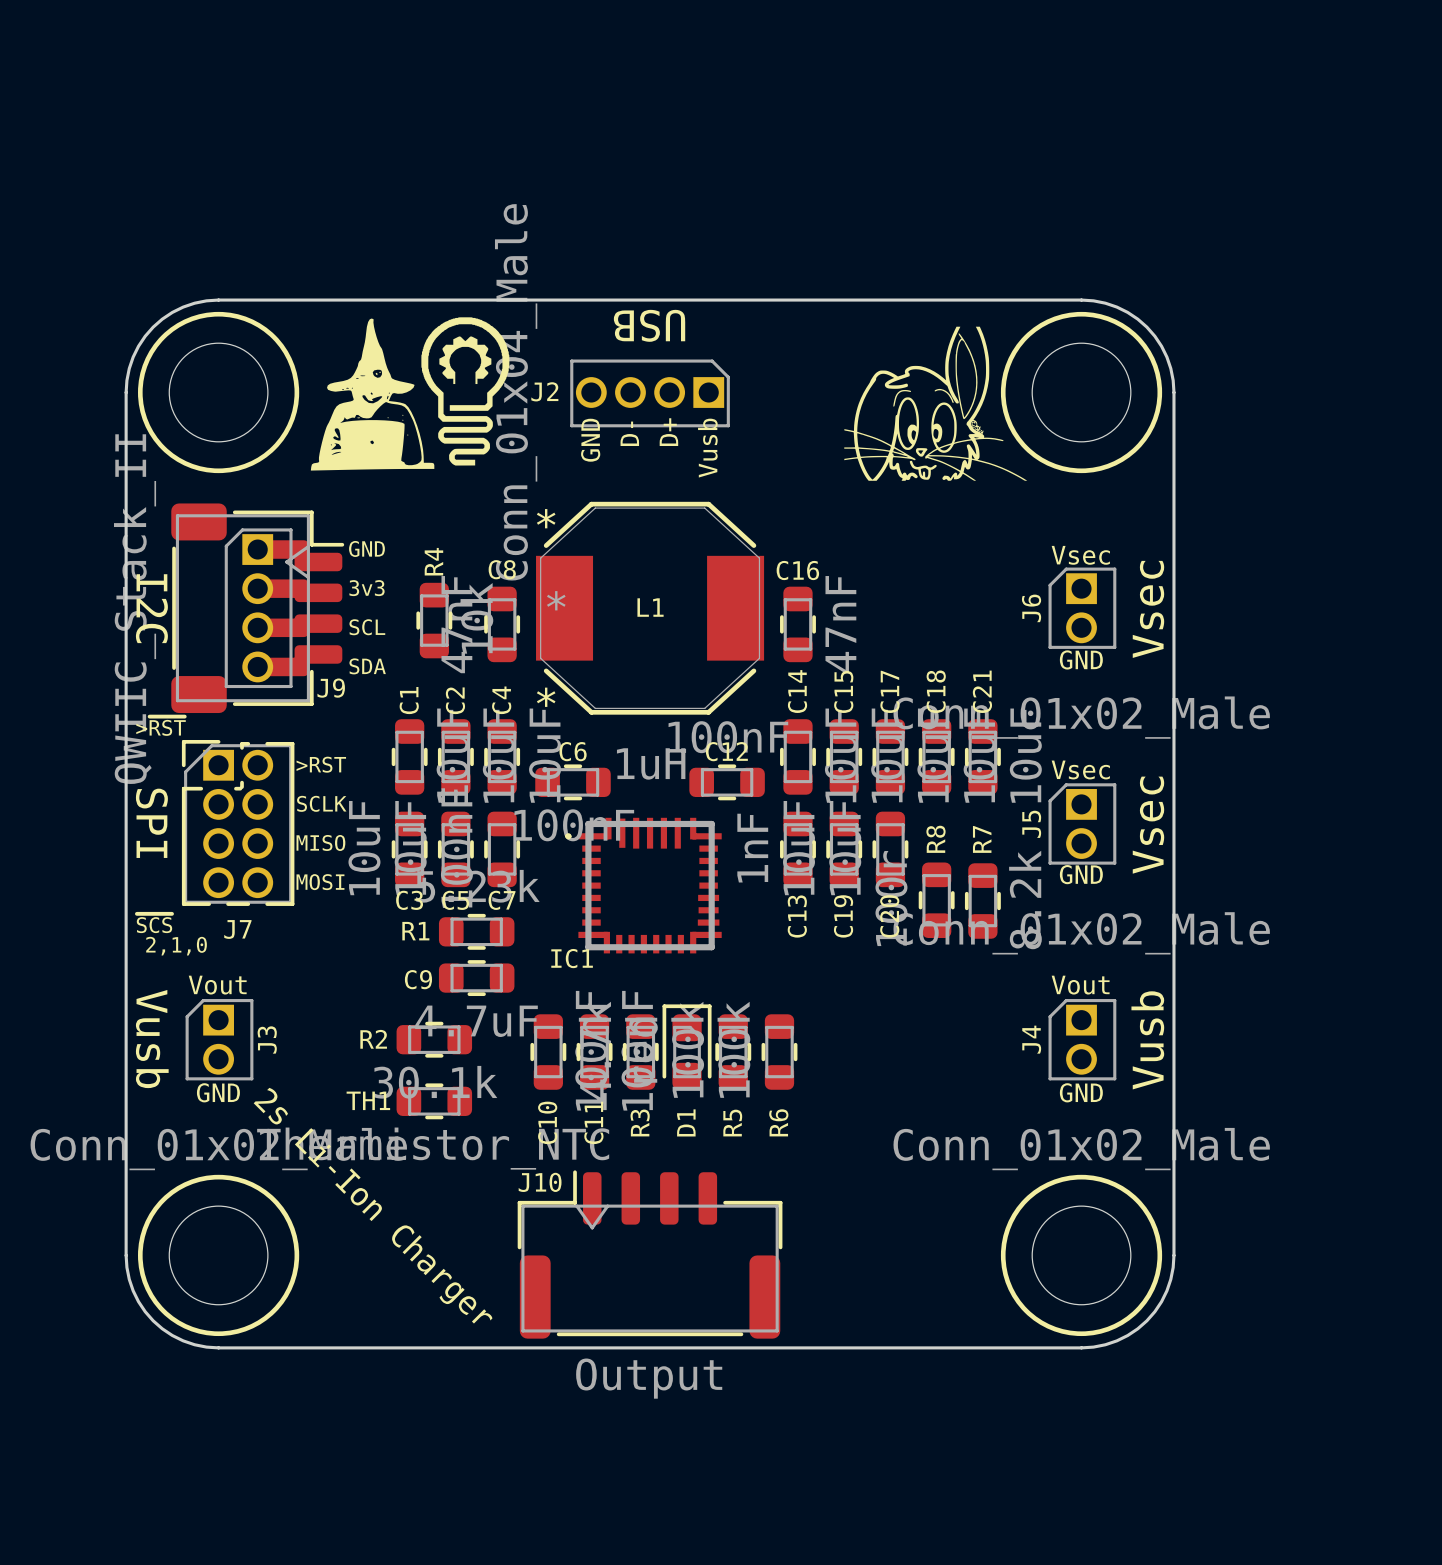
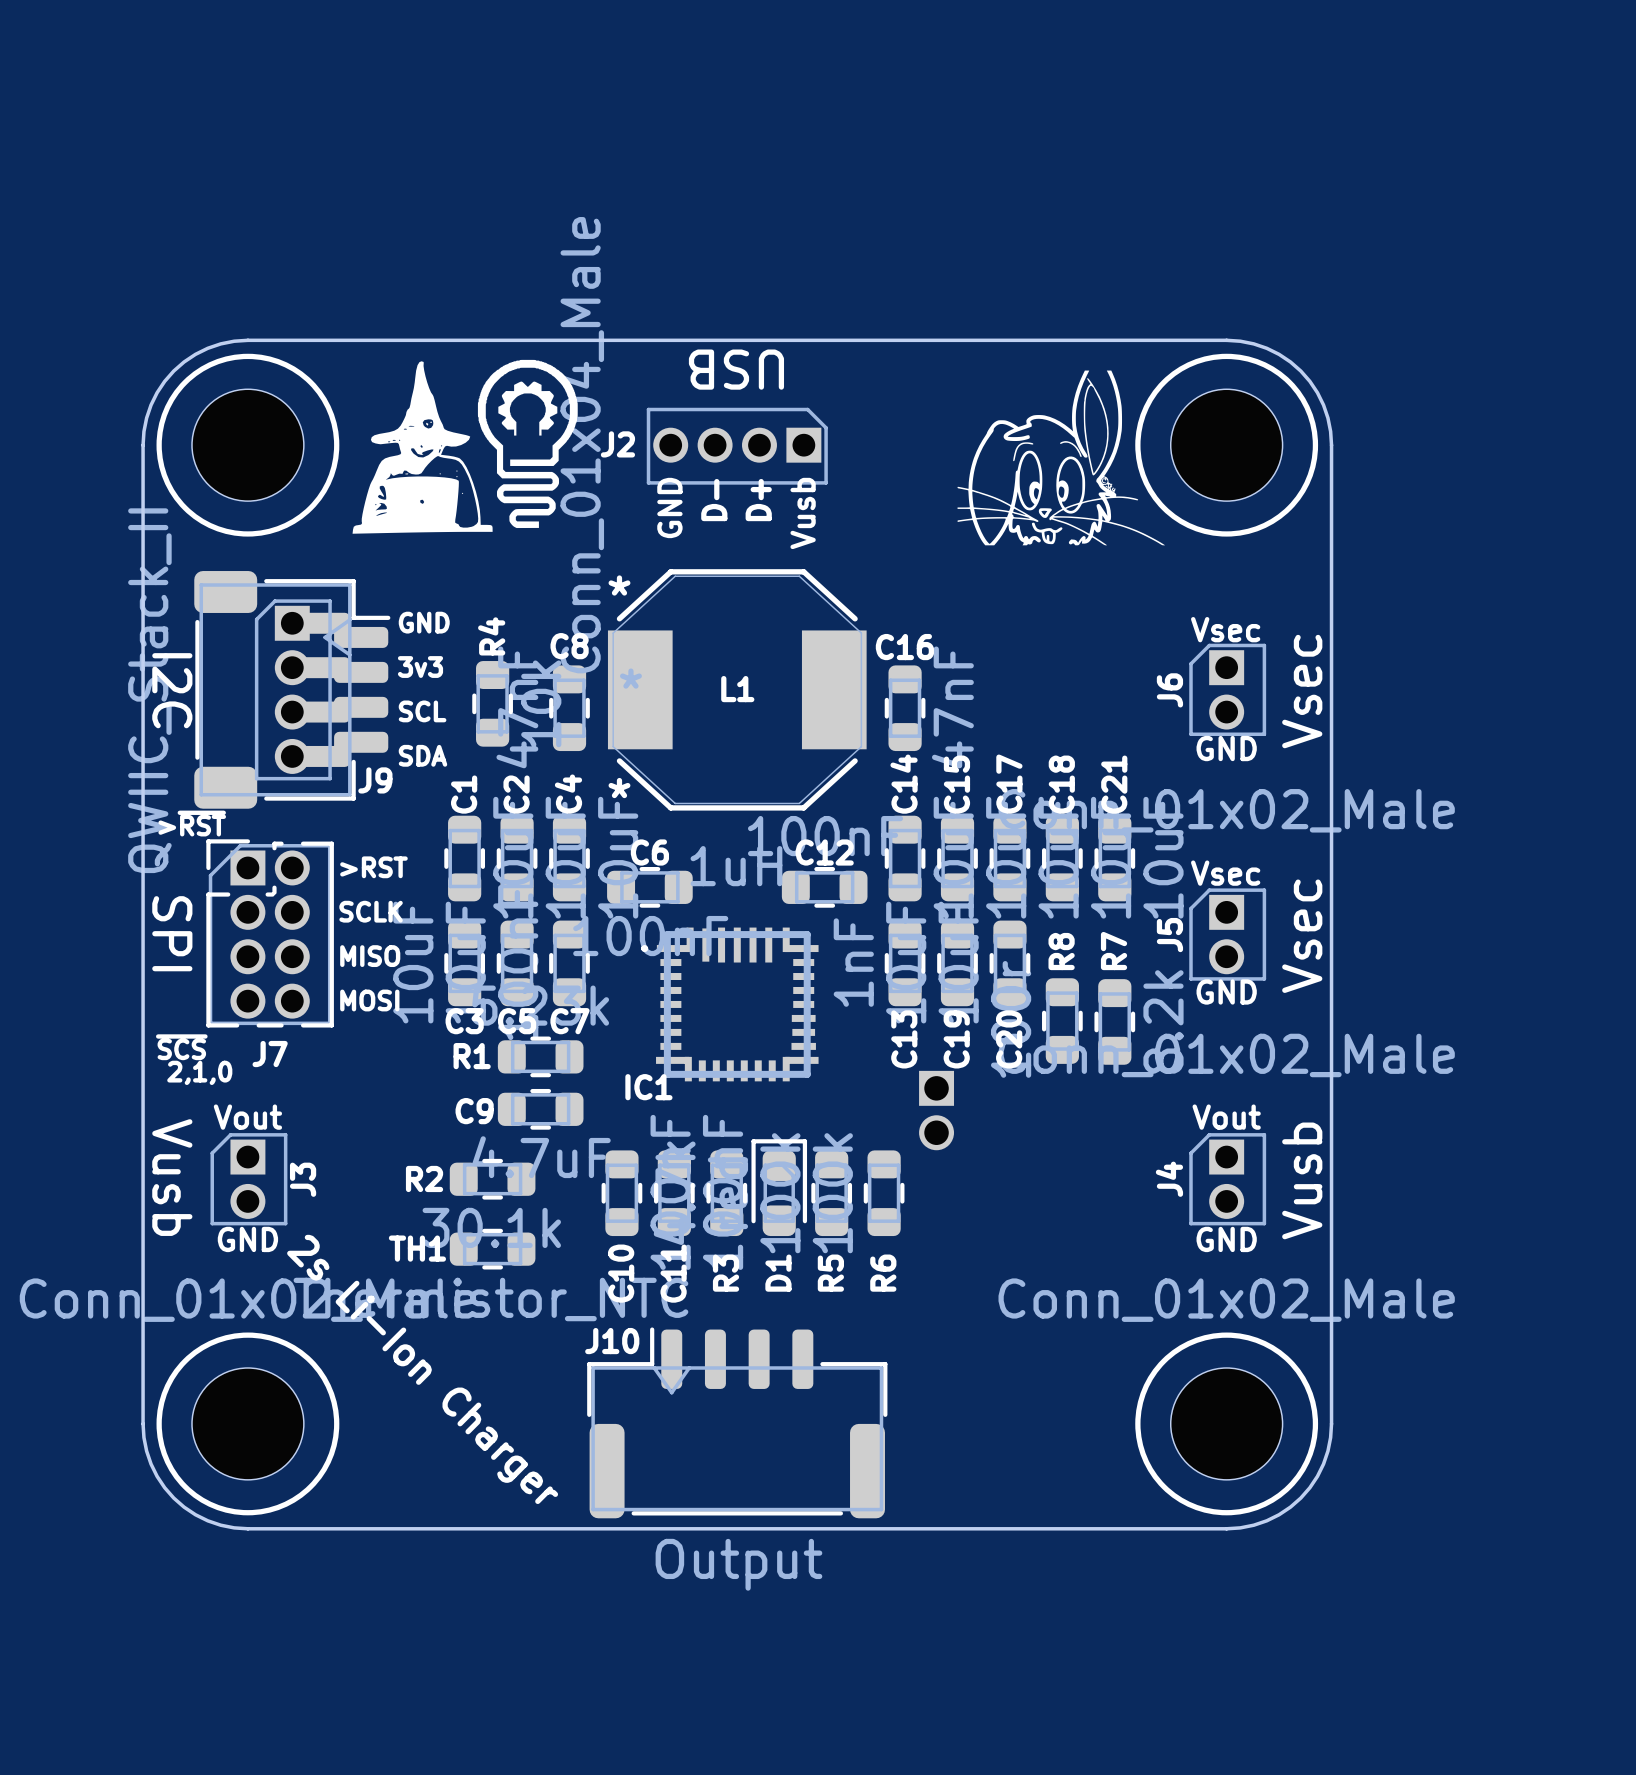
part: none -> (936, 1110)

